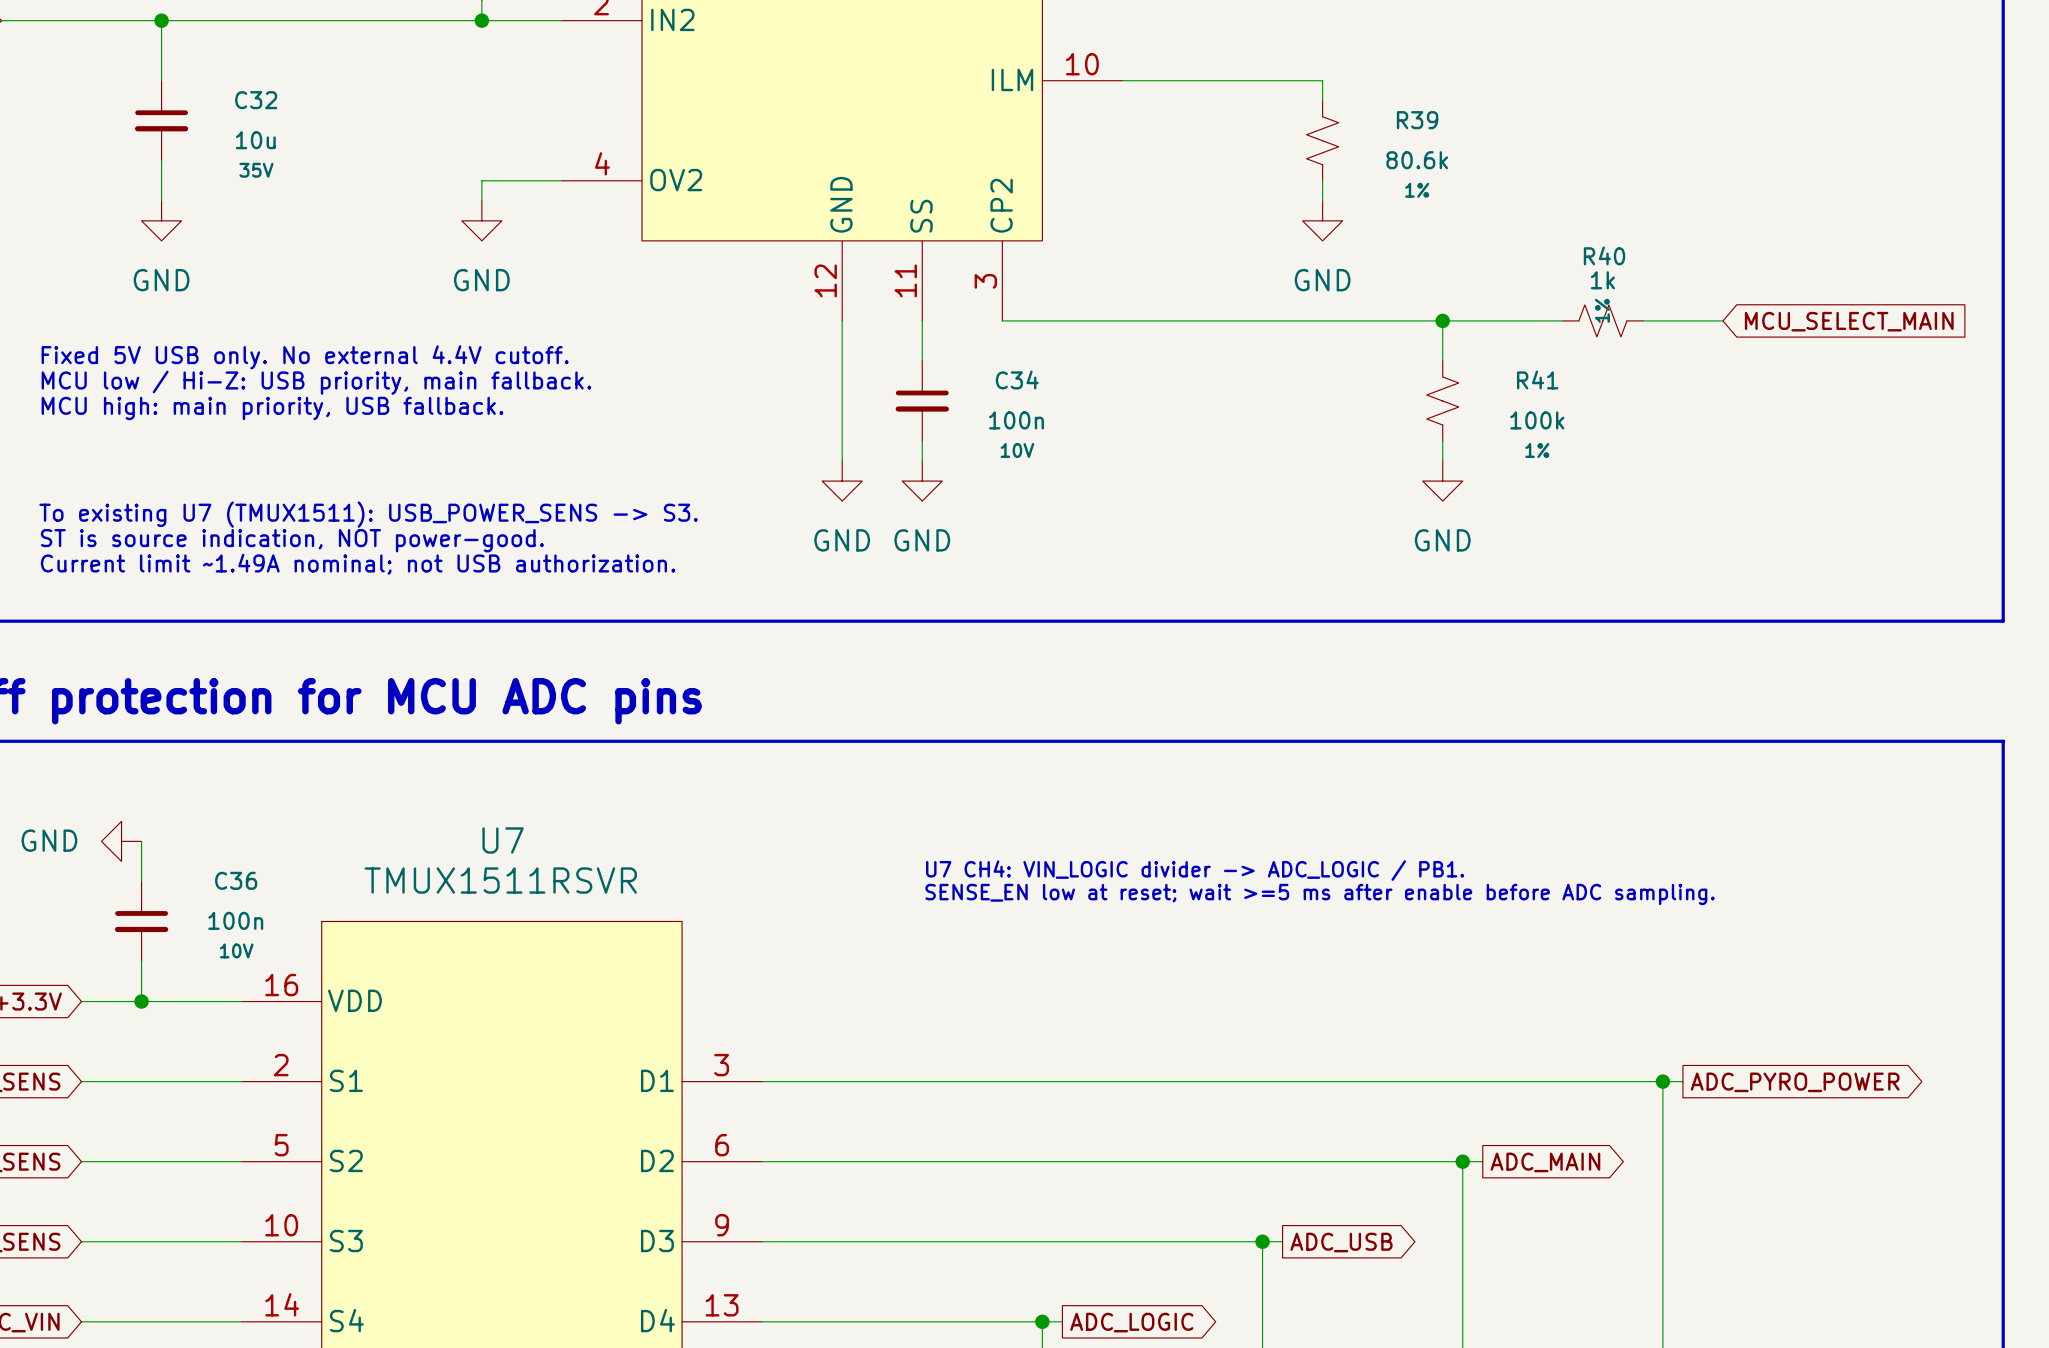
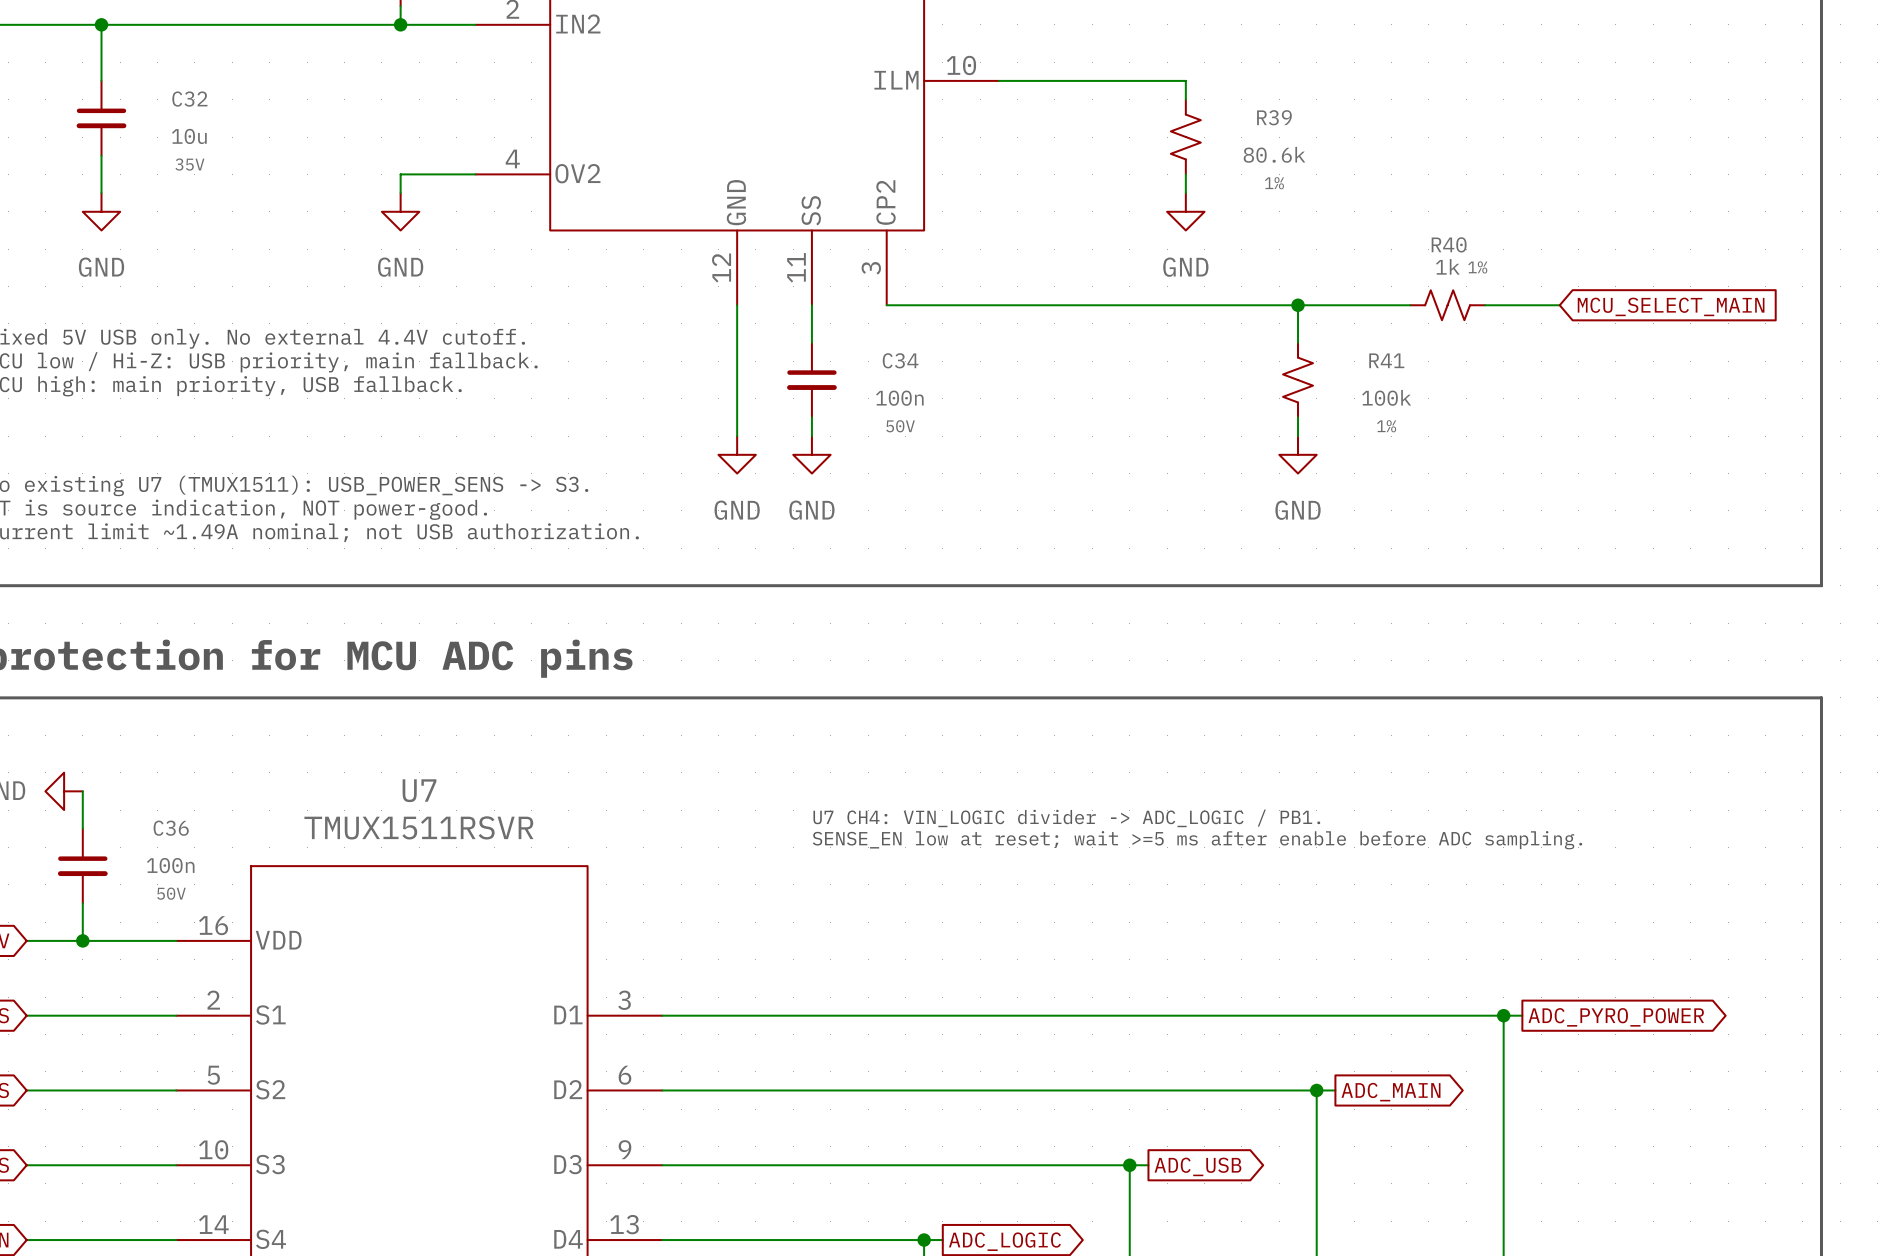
R40 text rotation: 0° (1602, 310) -> 90° clockwise (1477, 267)
R40 text position: 1% (1602, 310) -> 1% (1477, 267)
C34 text: 10V (1017, 450) -> 50V (900, 426)
C36 text: 10V (236, 950) -> 50V (171, 893)

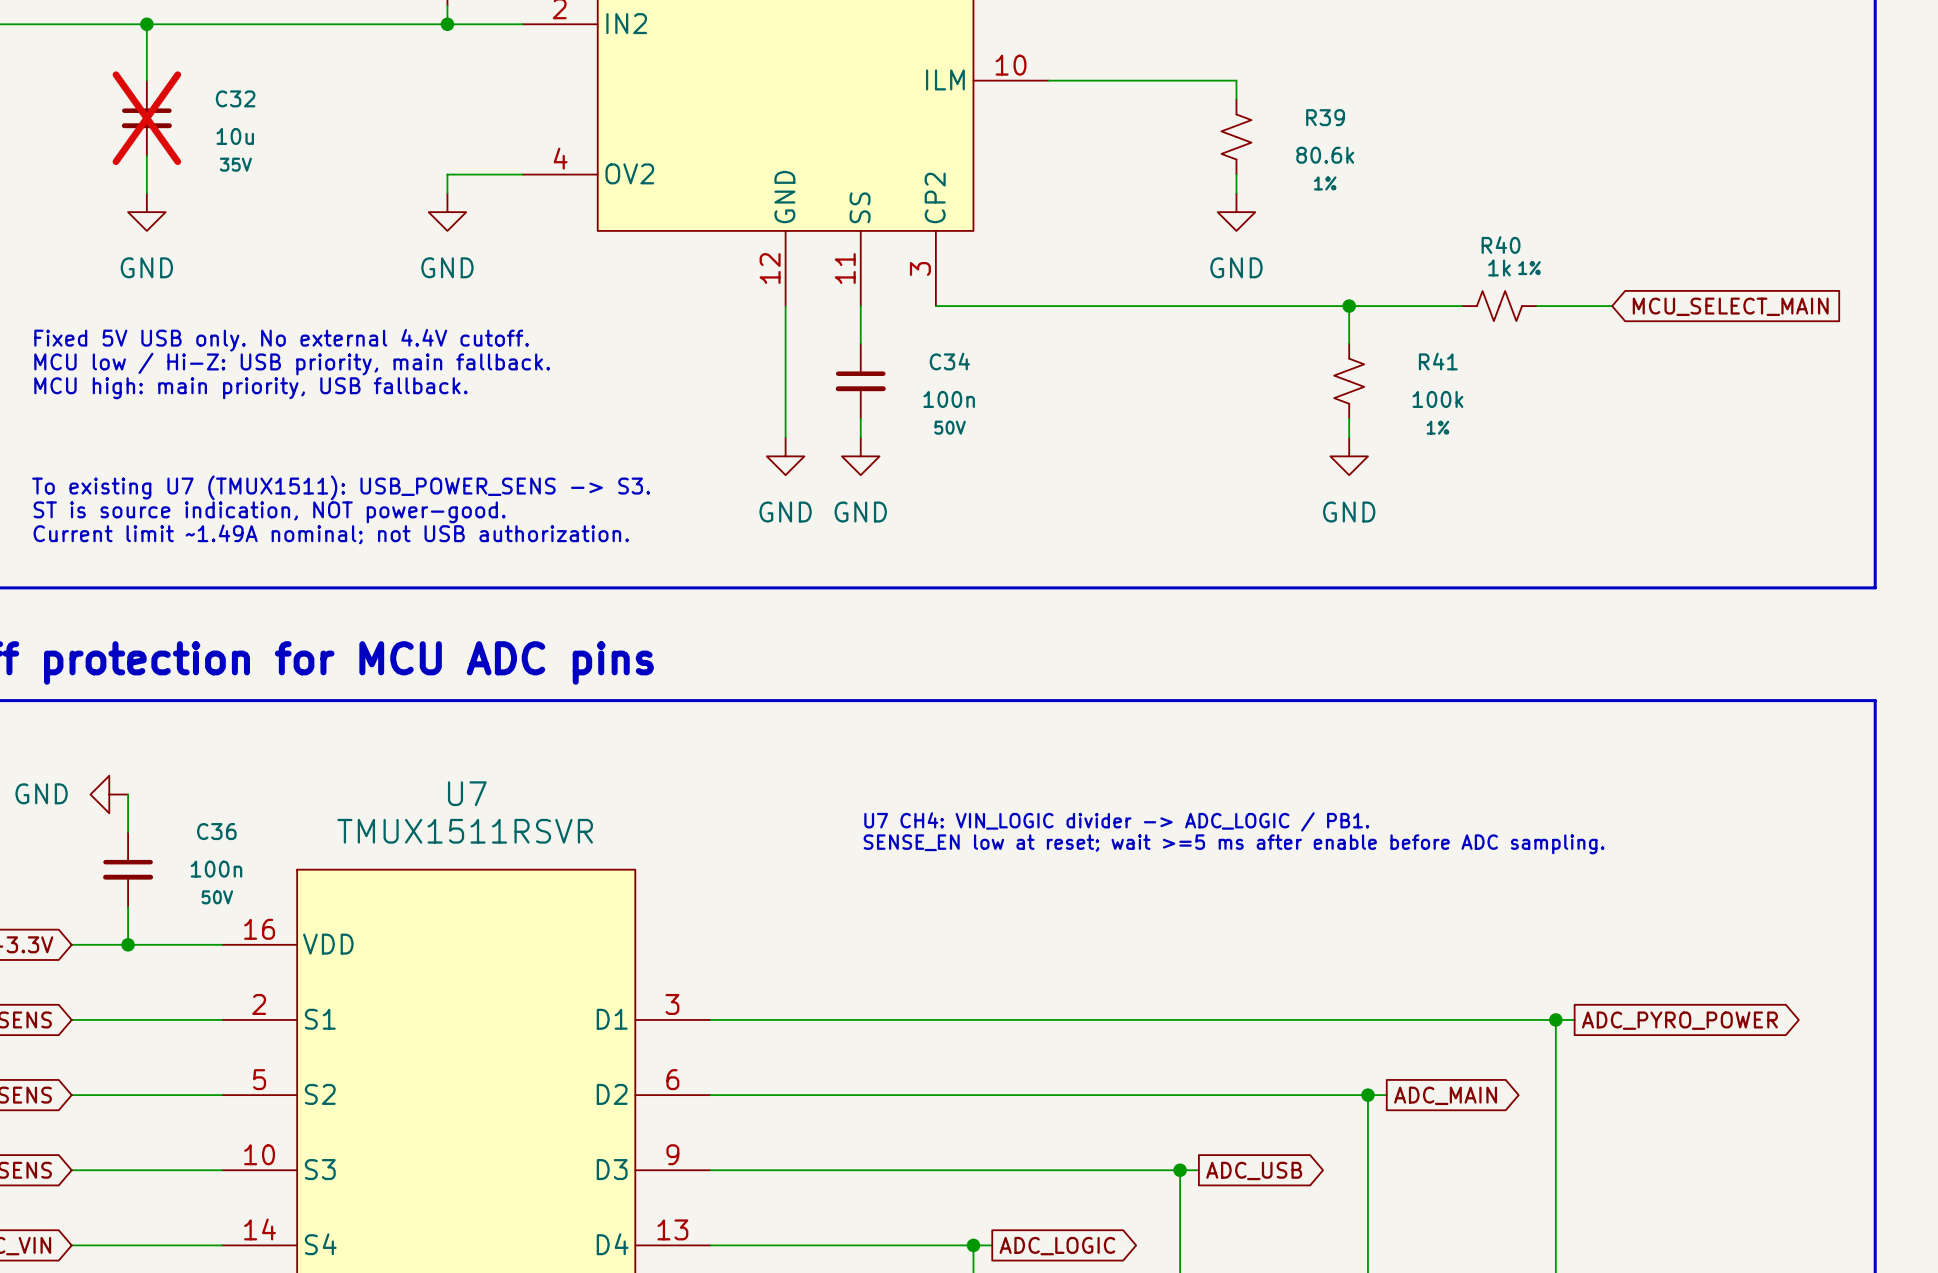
C32 do-not-place cross: none -> (146, 118)

